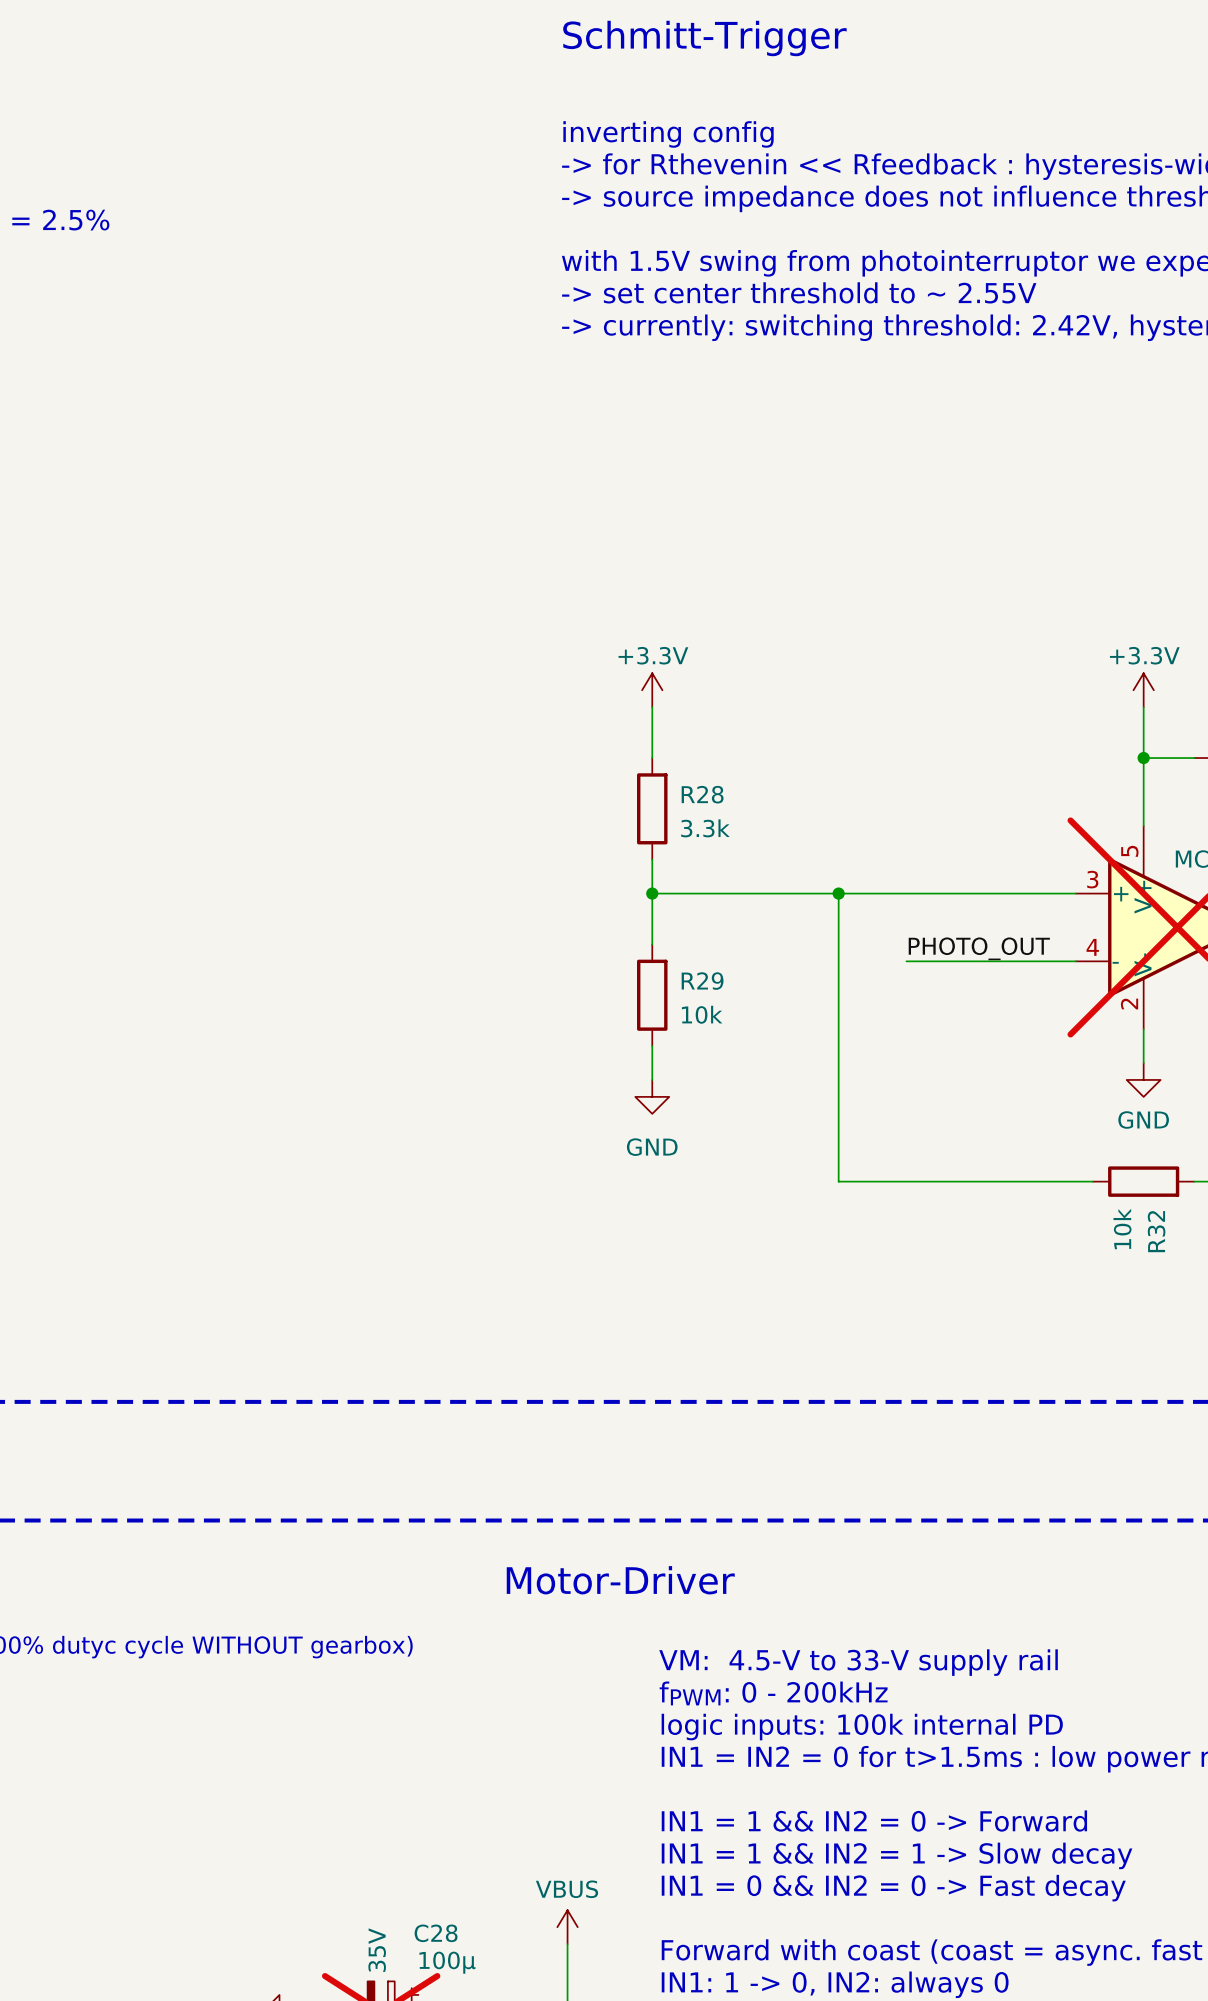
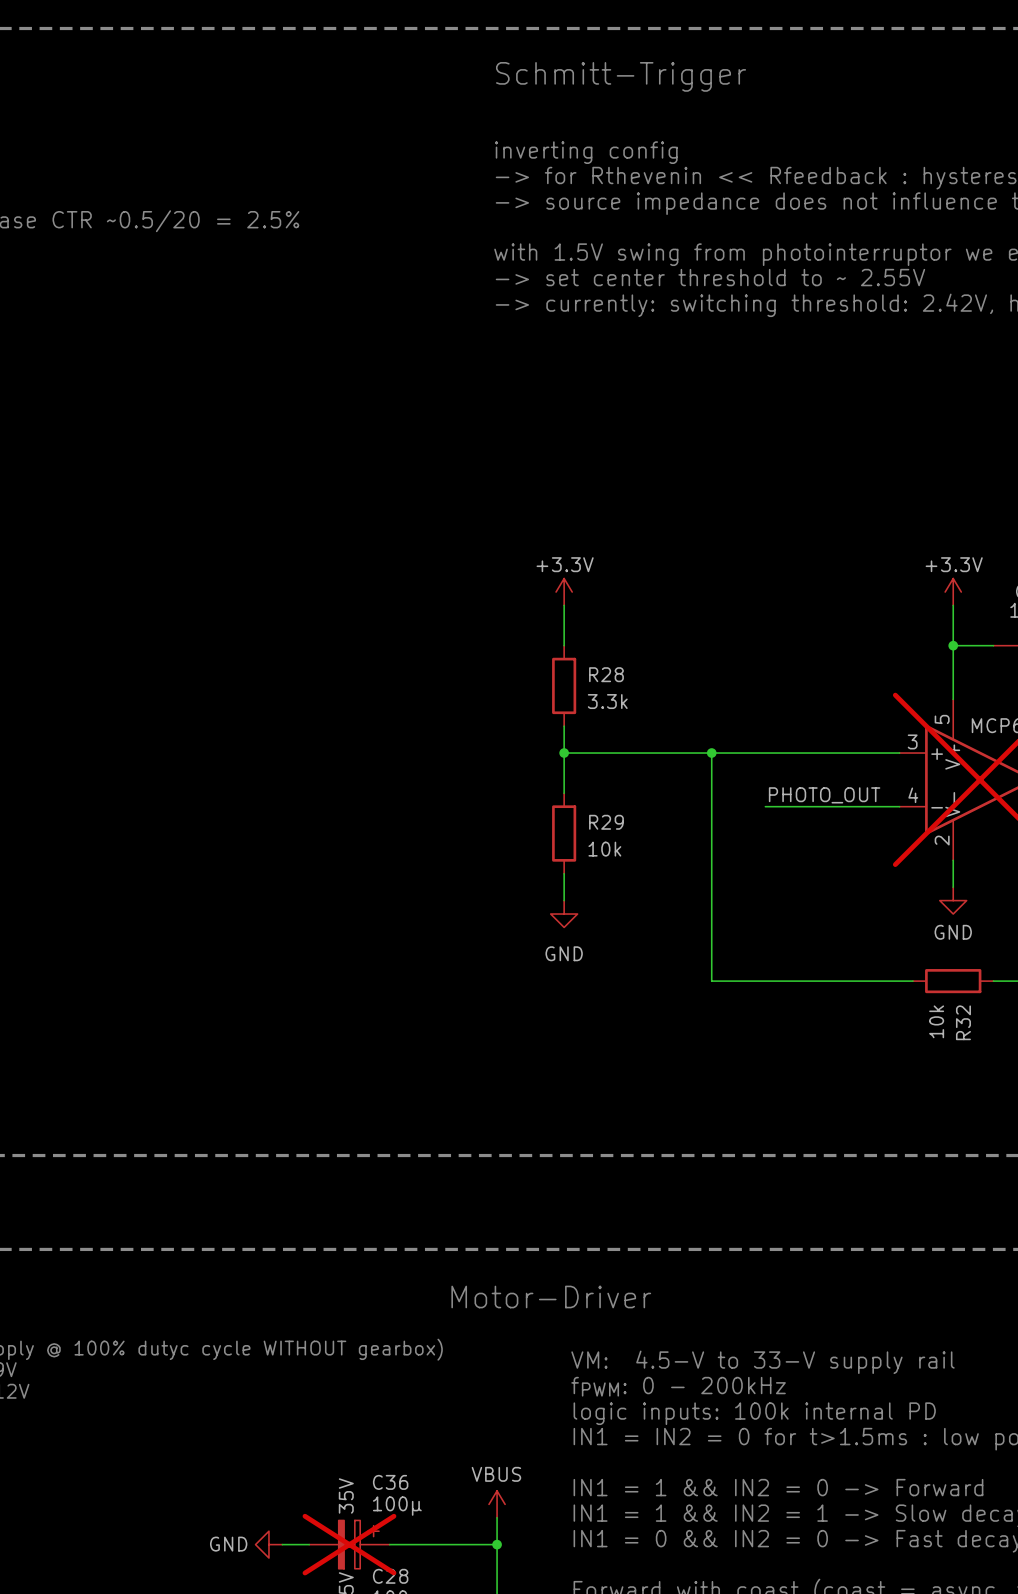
wire: none -> (497, 1517) (497, 1584)
power symbol: none -> GND (268, 1544)
wire: none -> (282, 1544) (309, 1544)
C36: none -> 100µ (349, 1544)
wire: none -> (389, 1544) (497, 1544)
junction: none -> (497, 1544)
power symbol position: VBUS (567, 1927) -> VBUS (497, 1504)

